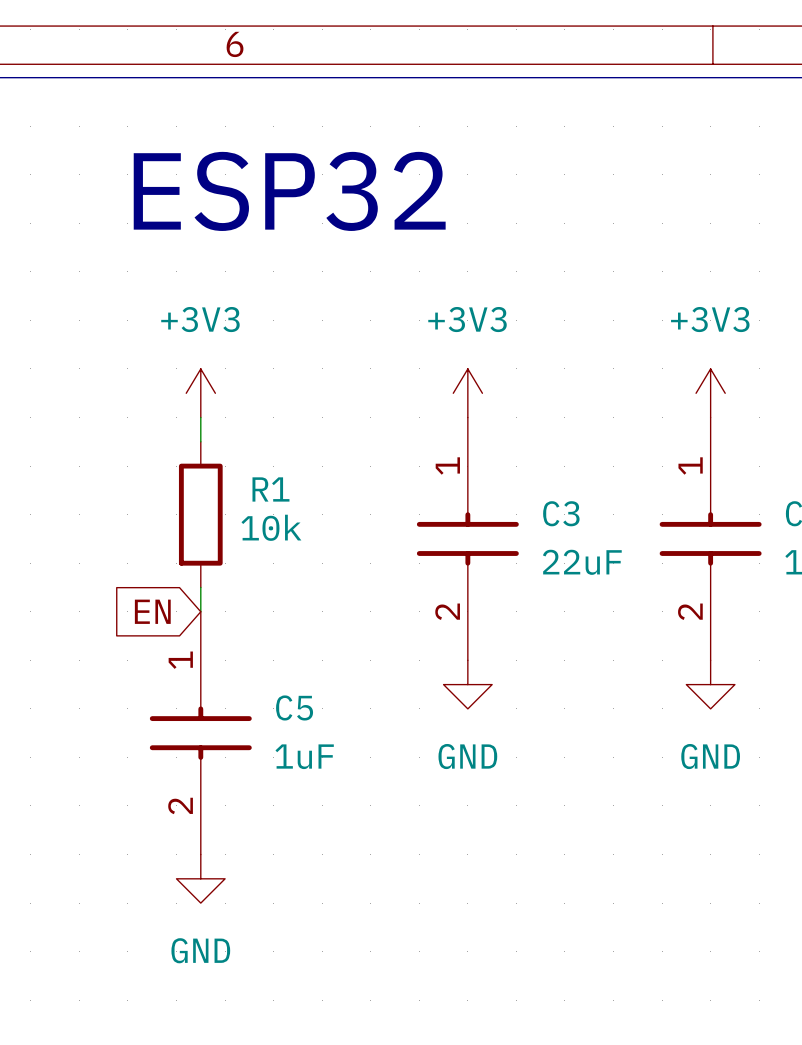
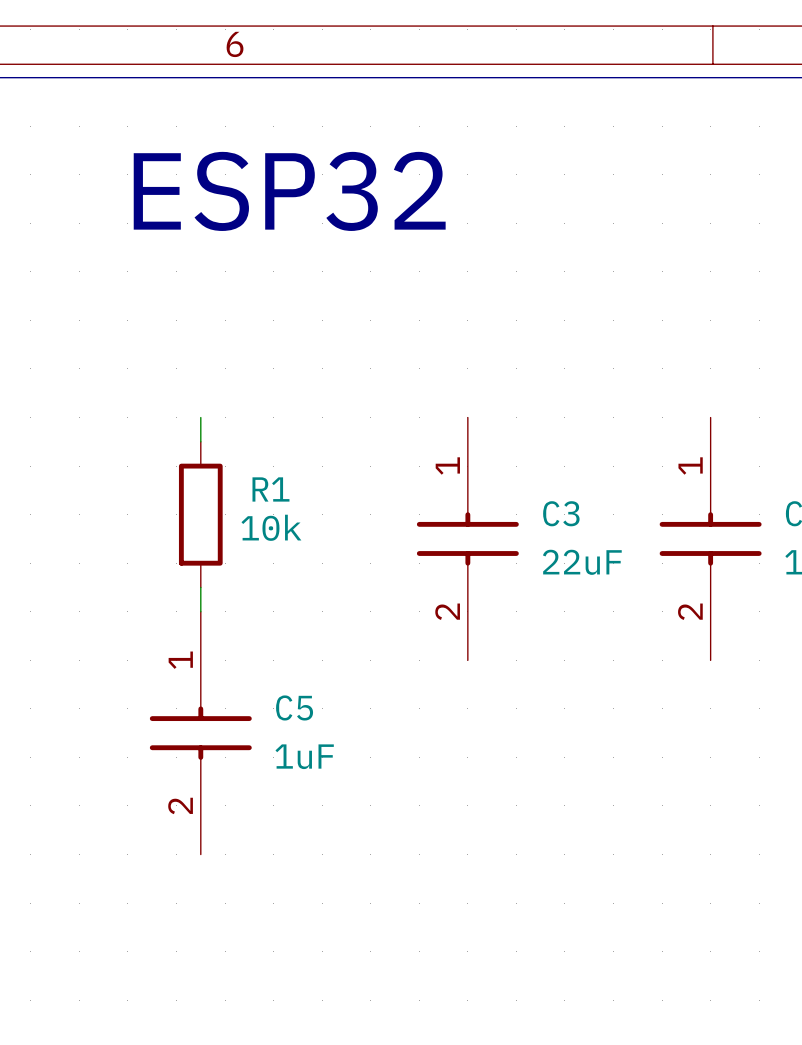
power symbol: +3V3 (200, 393) -> none
power symbol: +3V3 (467, 393) -> none
power symbol: +3V3 (710, 393) -> none
global label: EN (152, 611) -> none
power symbol: GND (467, 684) -> none
power symbol: GND (710, 684) -> none
power symbol: GND (200, 878) -> none

